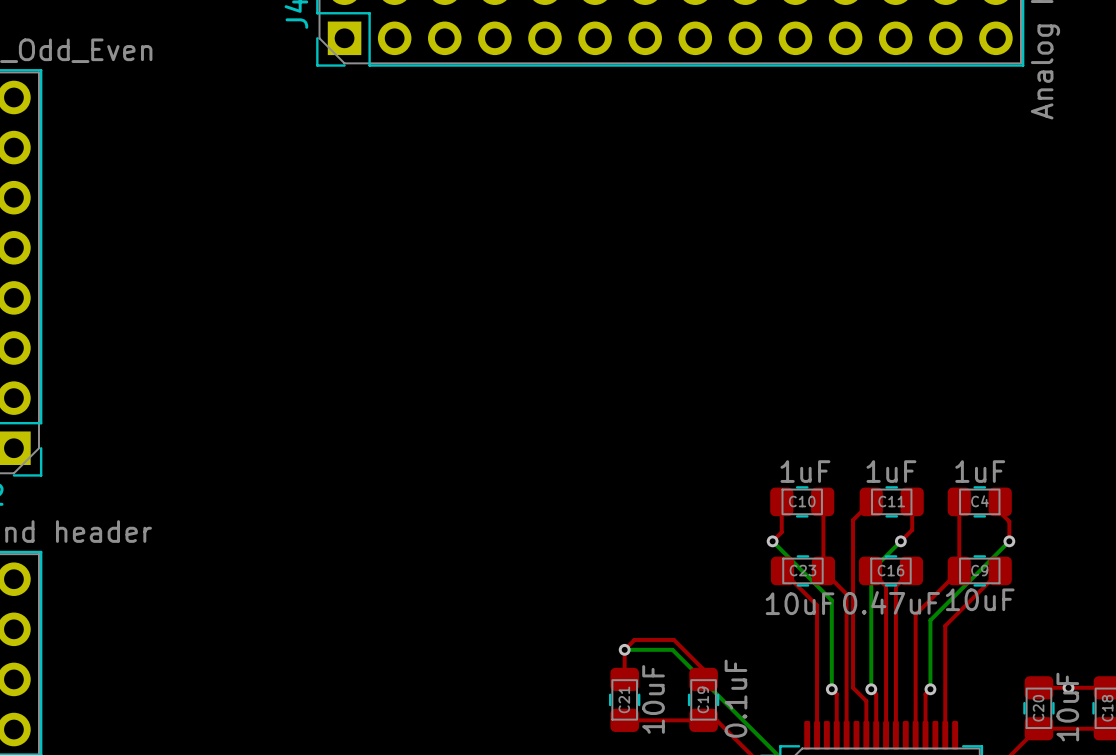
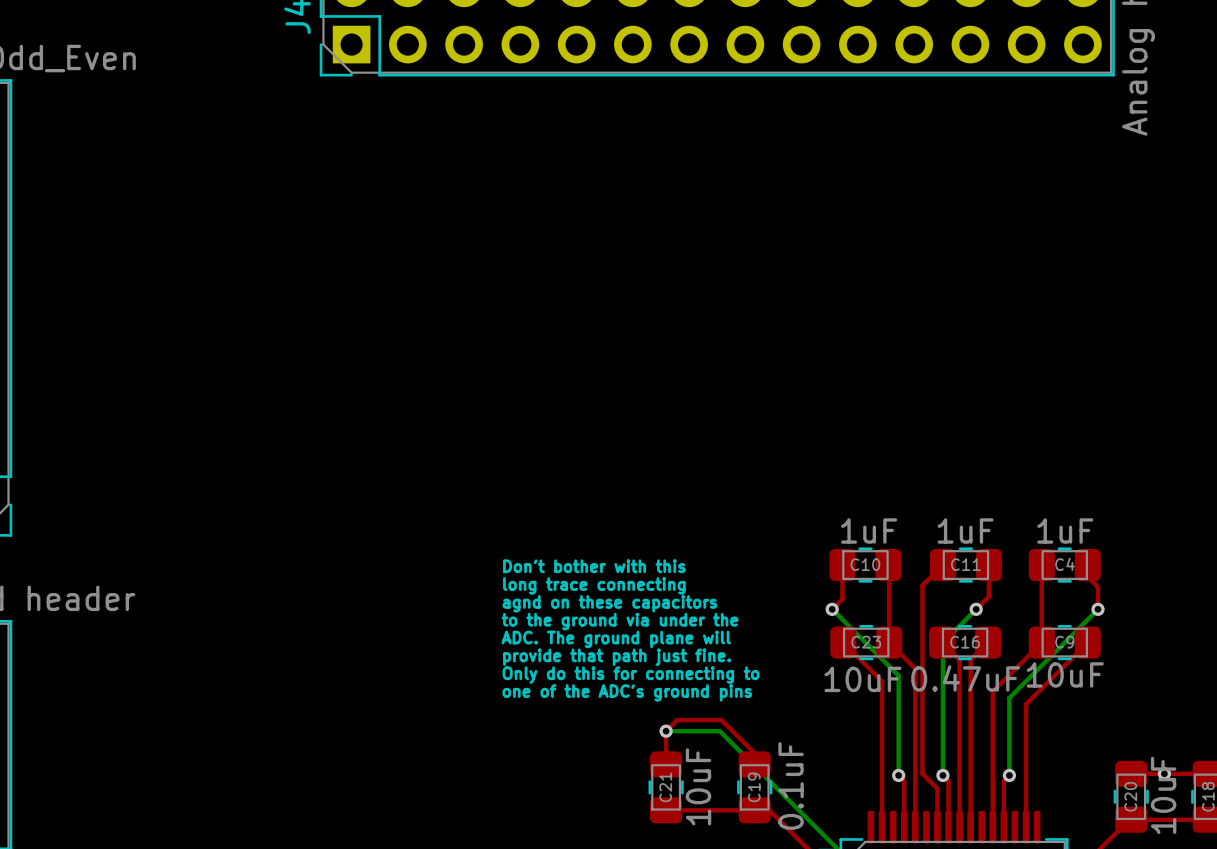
text: none -> Don't bother with this (594, 566)
text: none -> long trace connecting (594, 585)
text: none -> agnd on these capacitors (609, 603)
text: none -> to the ground via under the (619, 621)
text: none -> ADC. The ground plane will (616, 639)
text: none -> provide that path just fine. (617, 657)
text: none -> Only do this for connecting to (631, 675)
text: none -> one of the ADC's ground pins (627, 692)

